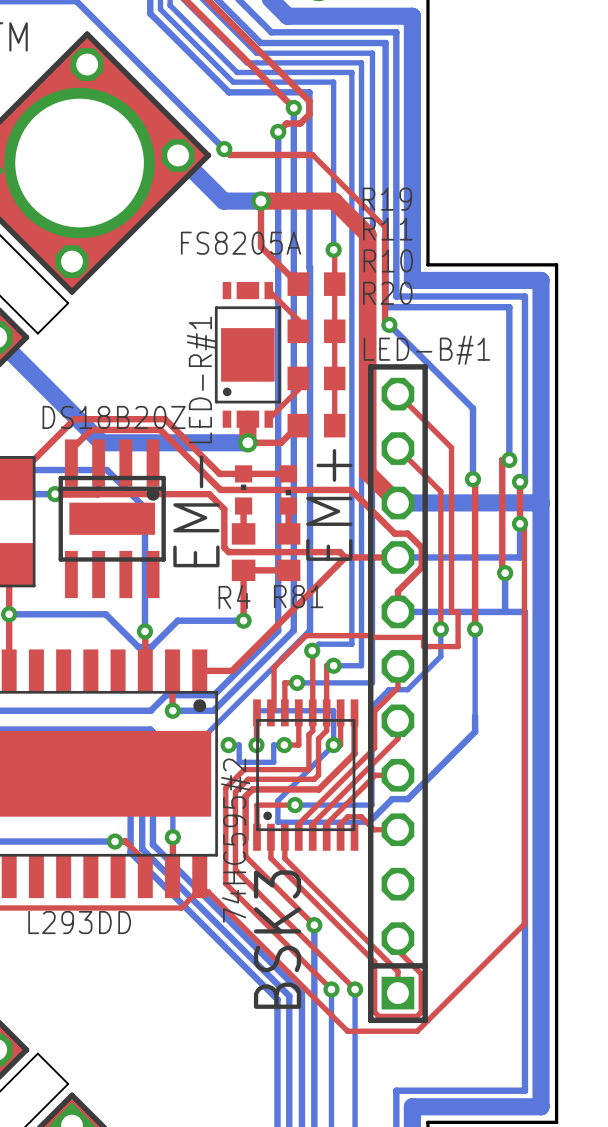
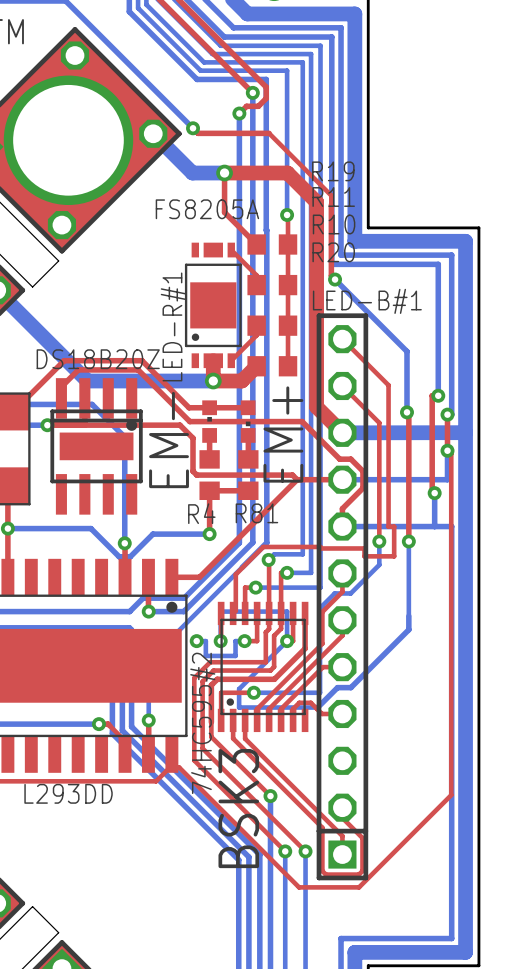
top track width: thin (298, 425) (281, 442) (247, 442) -> thick (256, 366) (241, 381) (213, 381)

